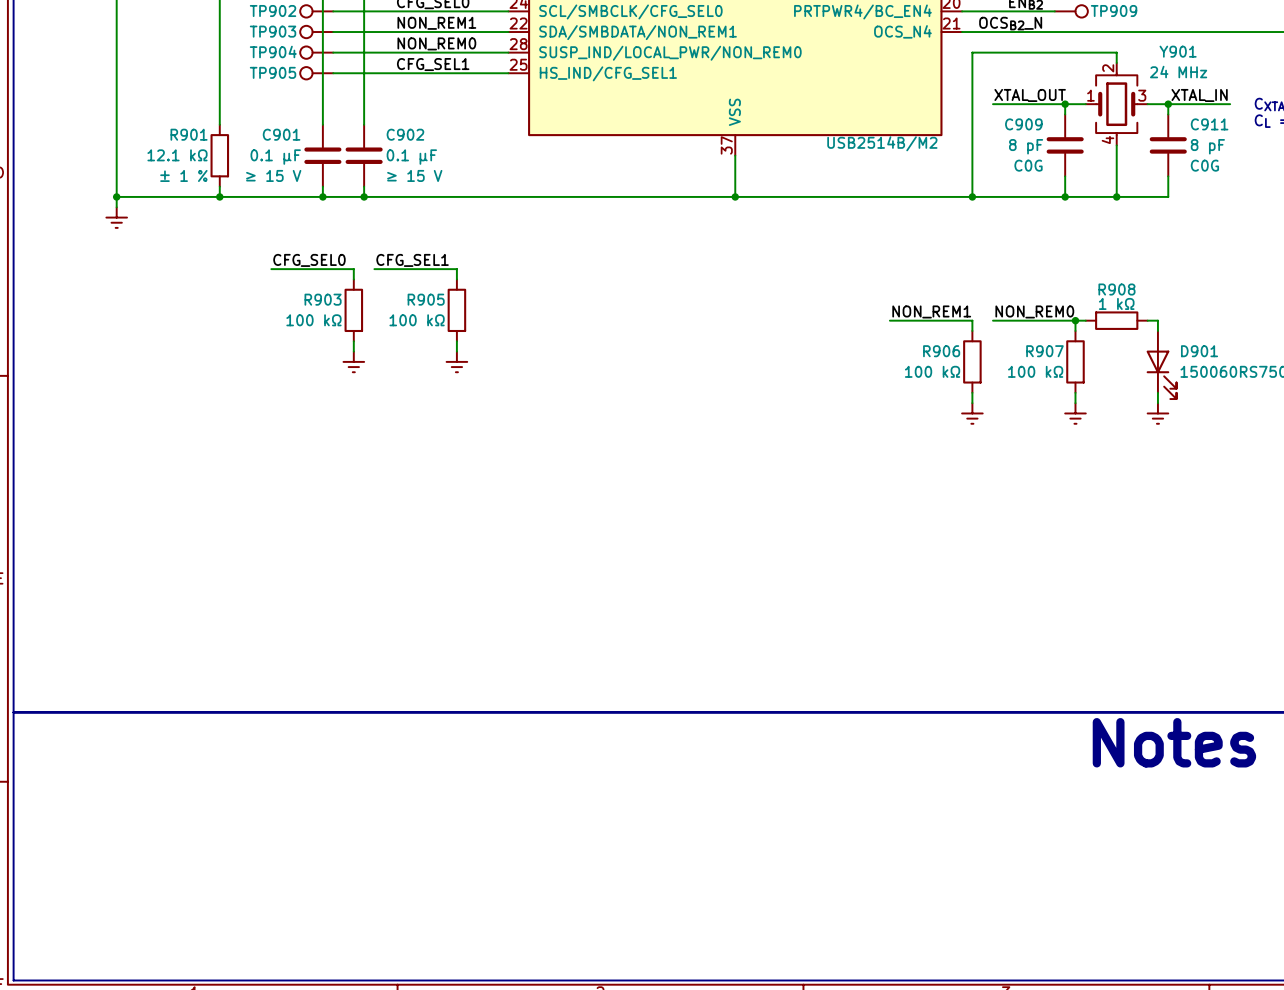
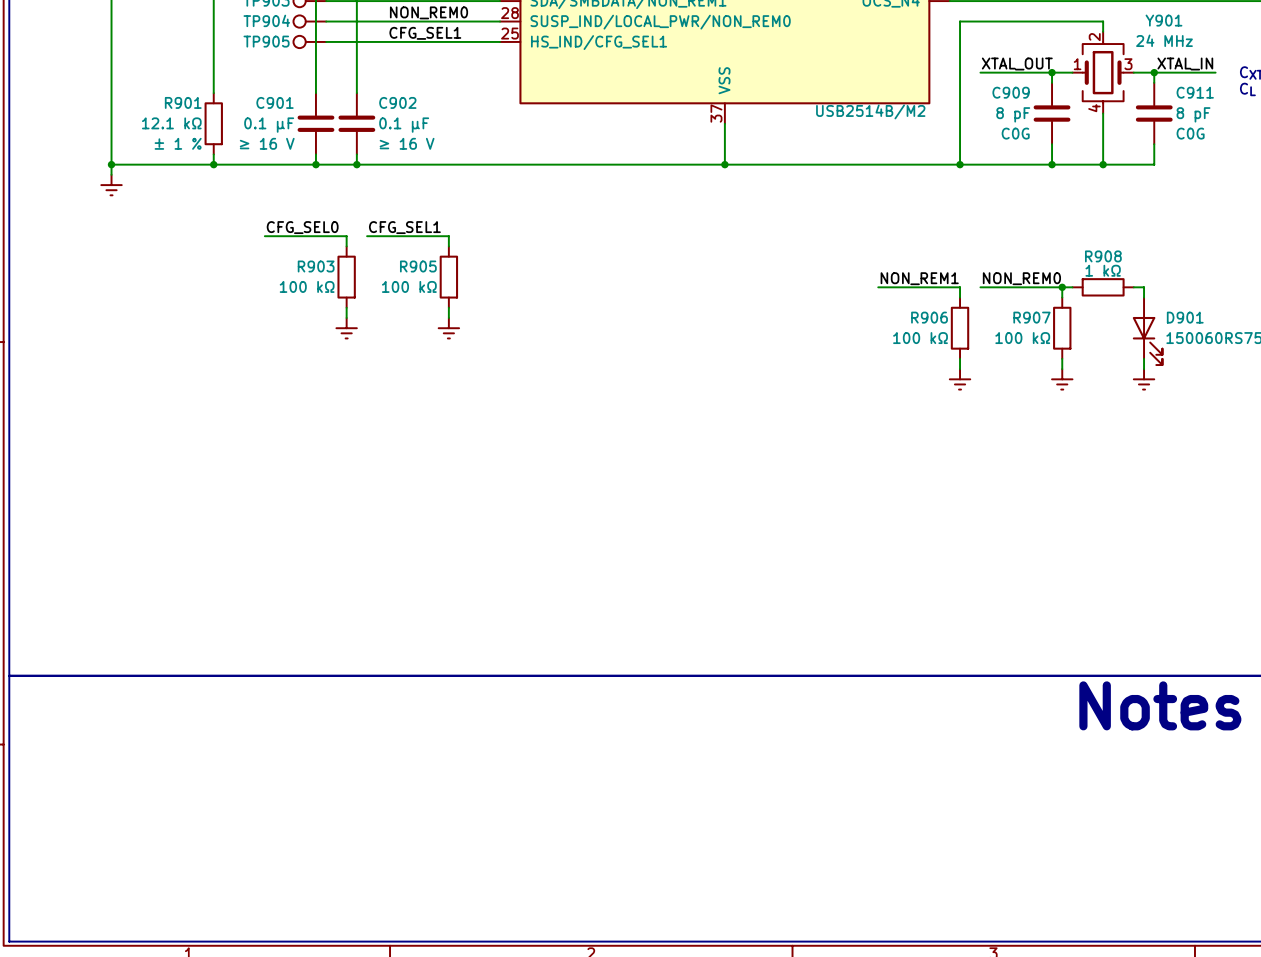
C901 text: ≥ 15 V (273, 175) -> ≥ 16 V (267, 143)
C902 text: ≥ 15 V (414, 175) -> ≥ 16 V (407, 143)

